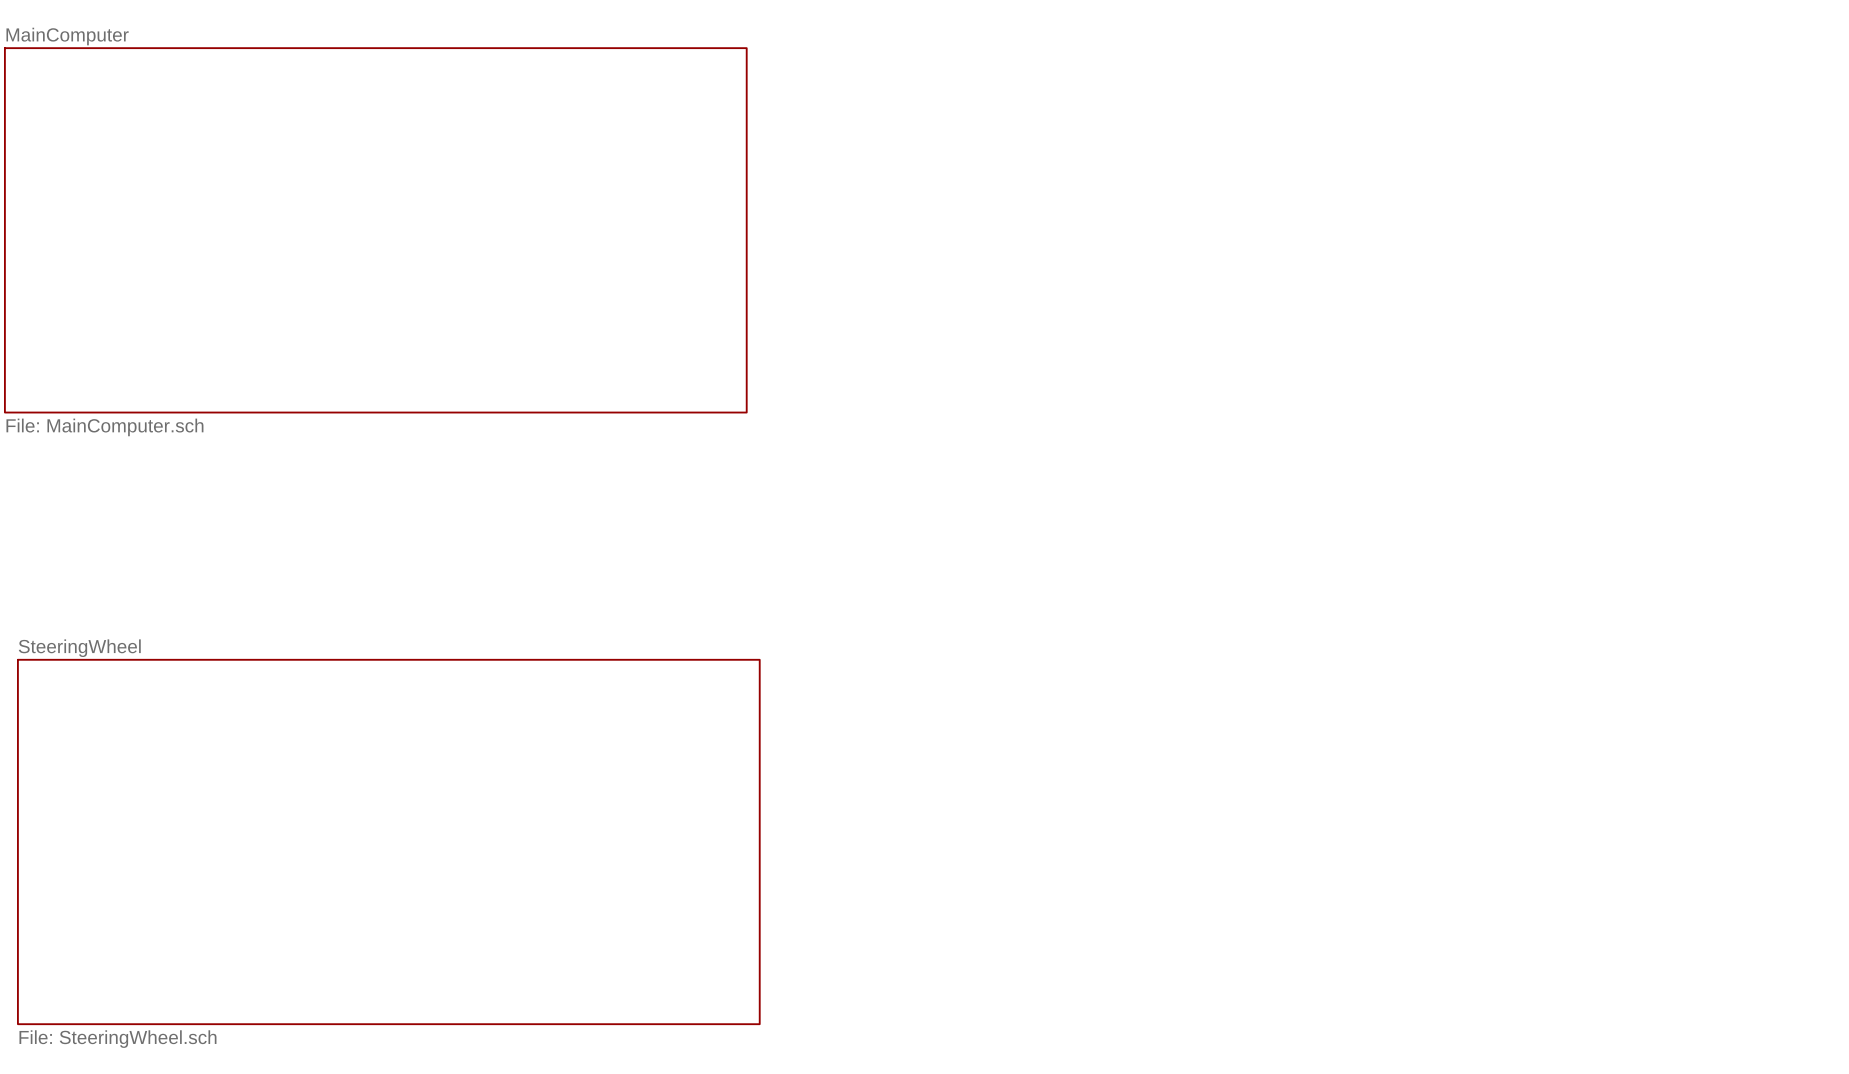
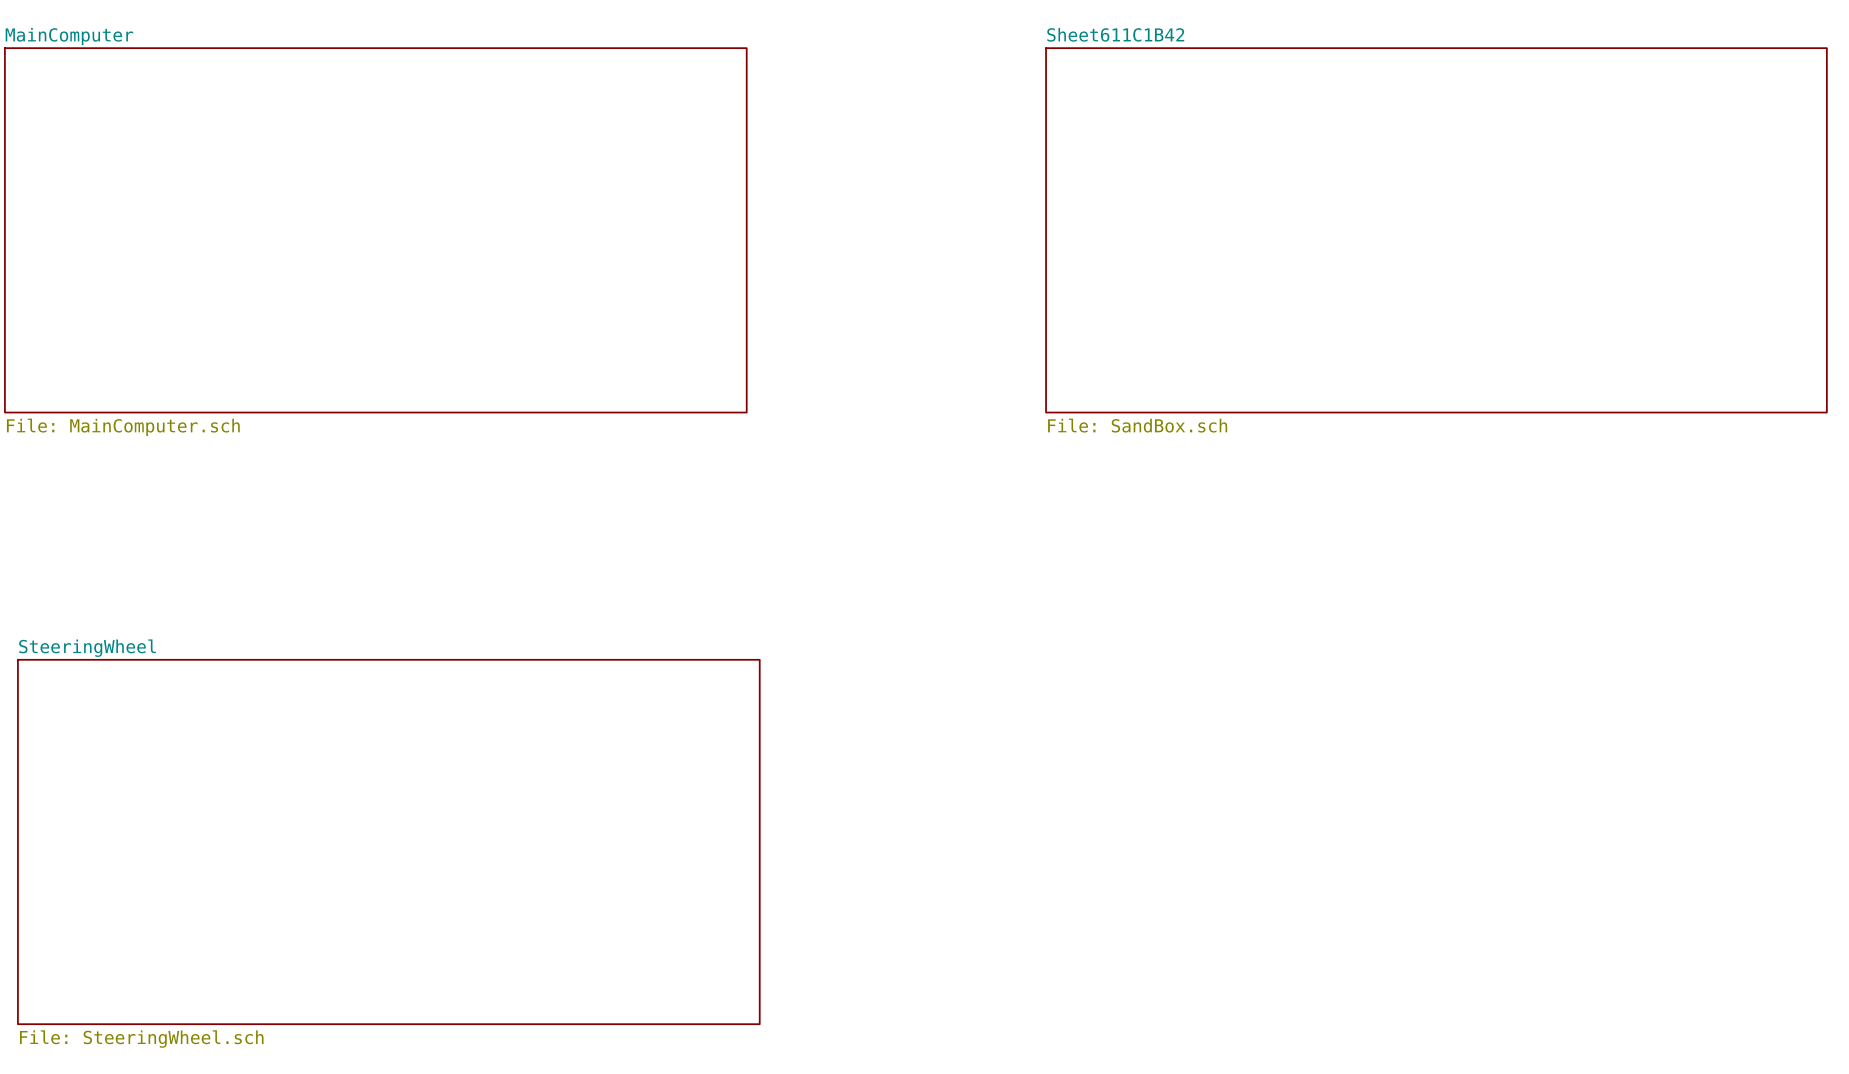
sheet Sheet611C1B42: none -> File: SandBox.sch (1436, 230)

